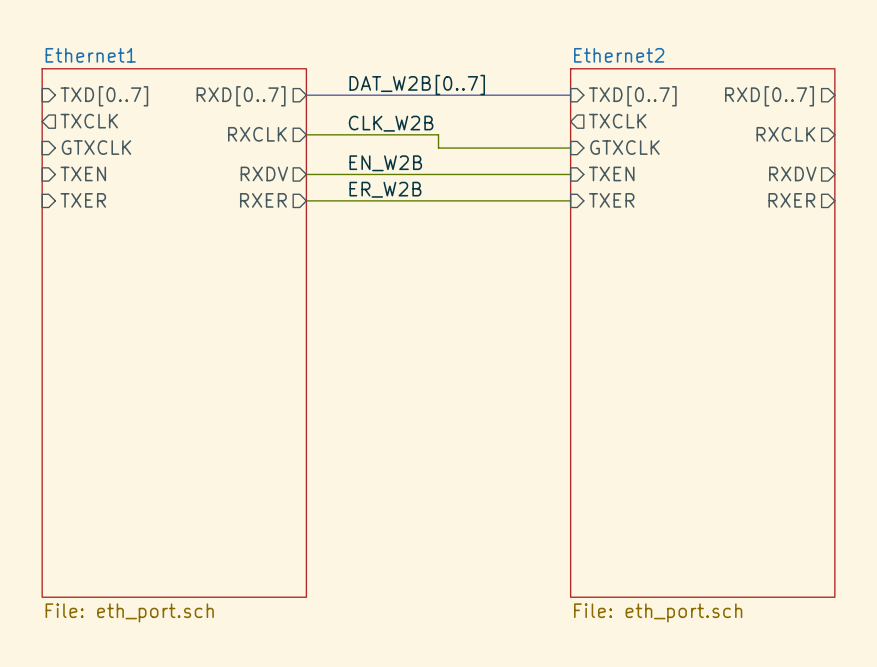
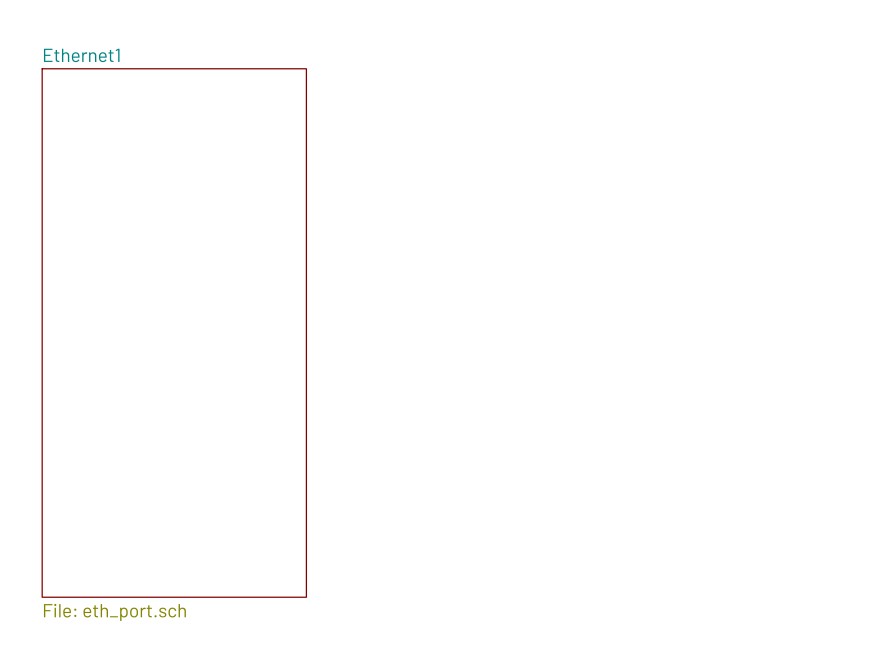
label: DAT_W2B[0..7] (417, 84) -> none
bus: (306, 95) (570, 95) -> none
sheet pin: TXD[0..7] (104, 96) -> none
sheet pin: RXD[0..7] (241, 96) -> none
sheet pin: TXD[0..7] (632, 96) -> none
sheet pin: RXD[0..7] (769, 96) -> none
sheet pin: TXCLK (89, 121) -> none
sheet pin: TXCLK (617, 121) -> none
label: CLK_W2B (391, 123) -> none
sheet pin: RXCLK (257, 134) -> none
wire: (306, 134) (438, 134) (438, 148) (570, 148) -> none
sheet pin: RXCLK (785, 134) -> none
sheet pin: GTXCLK (96, 147) -> none
sheet pin: GTXCLK (624, 147) -> none
label: EN_W2B (385, 163) -> none
sheet pin: TXEN (83, 173) -> none
sheet pin: RXDV (264, 173) -> none
sheet pin: TXEN (611, 173) -> none
sheet pin: RXDV (792, 173) -> none
wire: (306, 174) (570, 174) -> none
label: ER_W2B (385, 189) -> none
sheet pin: TXER (83, 200) -> none
sheet pin: RXER (263, 200) -> none
wire: (306, 200) (570, 200) -> none
sheet pin: TXER (611, 200) -> none
sheet pin: RXER (791, 200) -> none
sheet Ethernet2: File: eth_port.sch (702, 333) -> none

